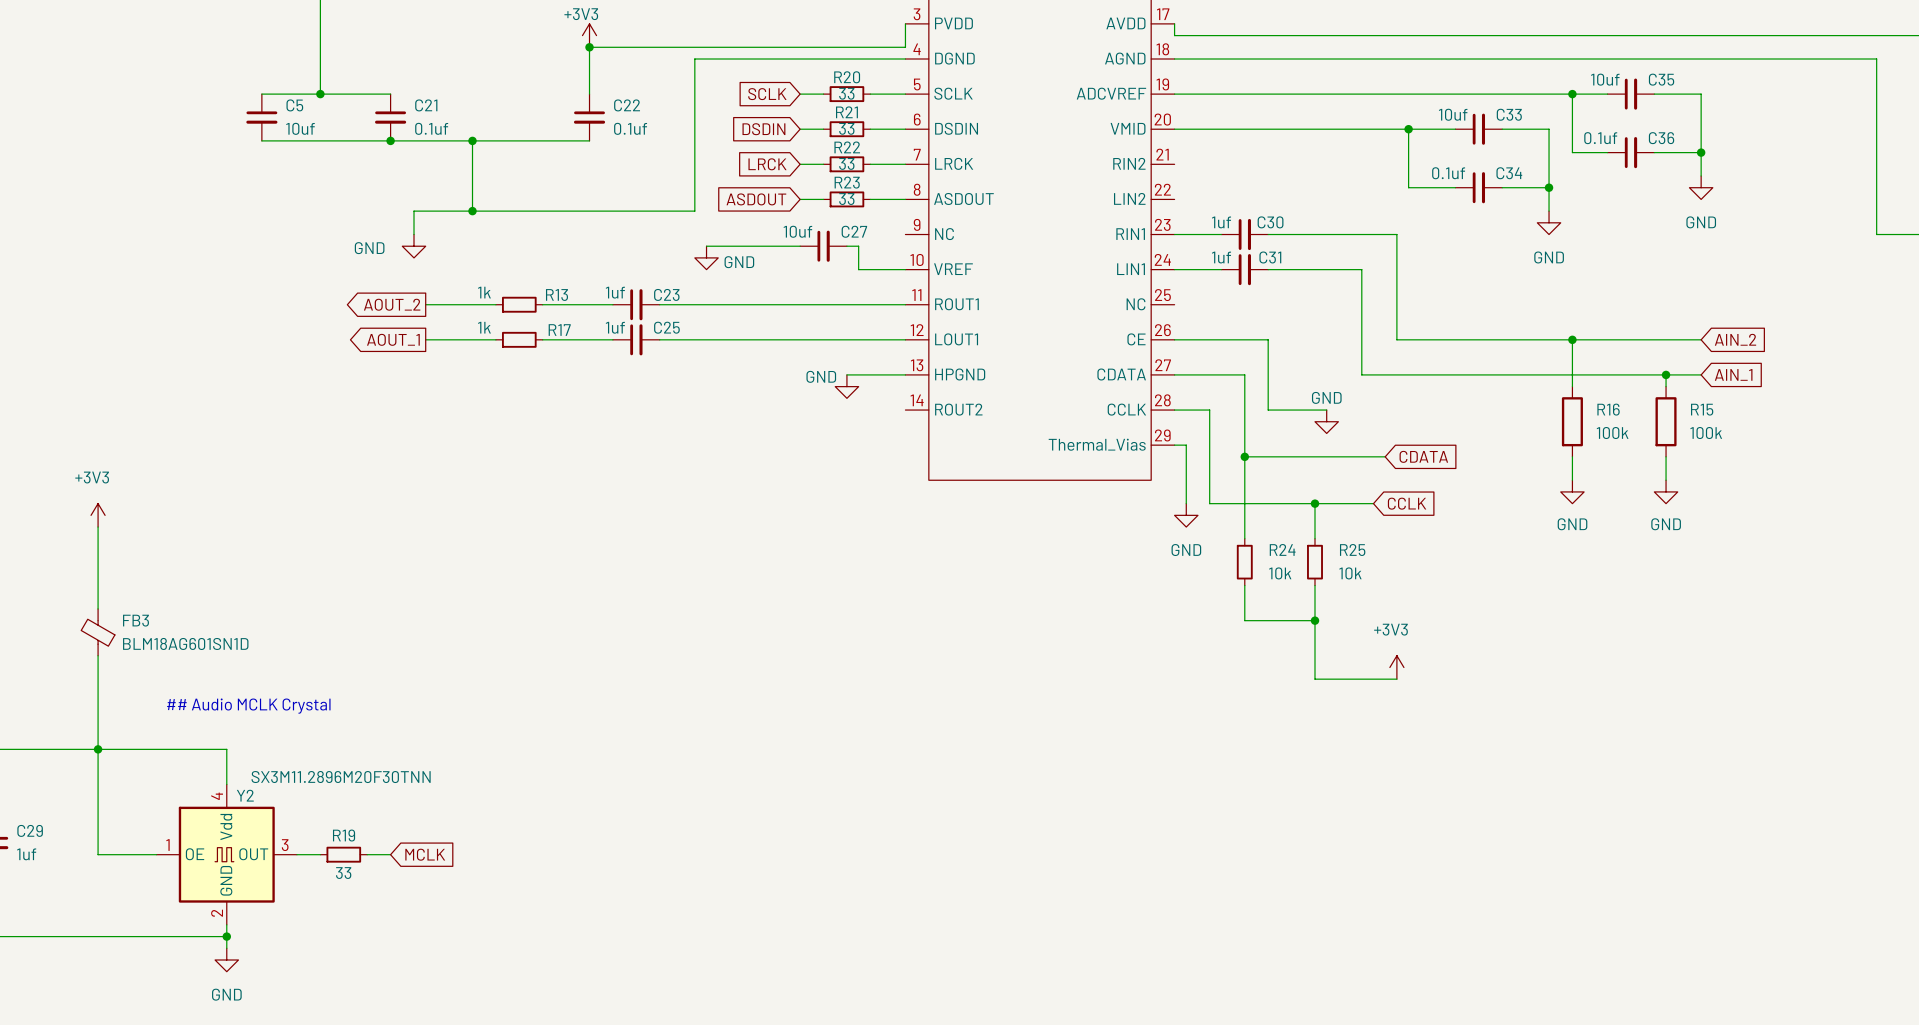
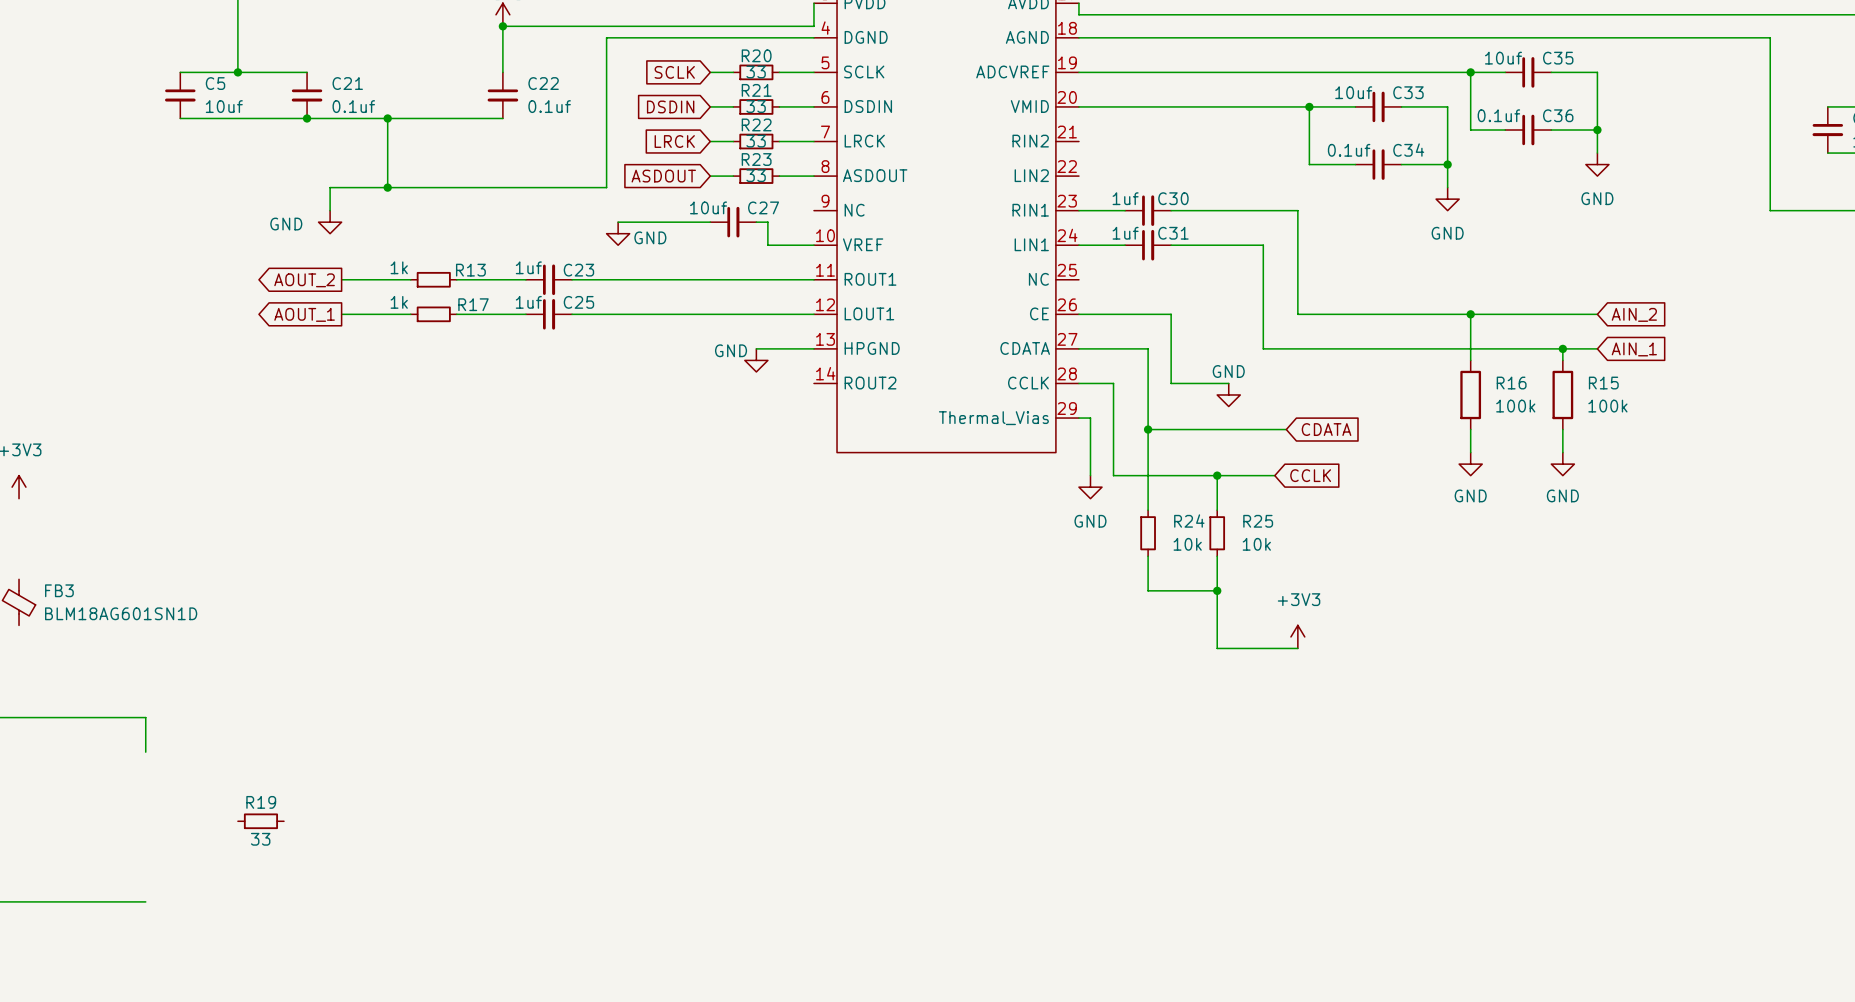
wire: (98, 527) (98, 608) -> none
wire: (98, 655) (98, 854) (156, 854) -> none
text: ## Audio MCLK Crystal (248, 706) -> none
junction: (98, 749) -> none
Y2: SX3M11.2896M20F30TNN (226, 854) -> none
wire: (296, 854) (320, 854) -> none
wire: (367, 854) (390, 854) -> none
global label: MCLK (425, 854) -> none
wire: (226, 924) (226, 948) -> none
junction: (226, 936) -> none
power symbol: GND (226, 959) -> none

